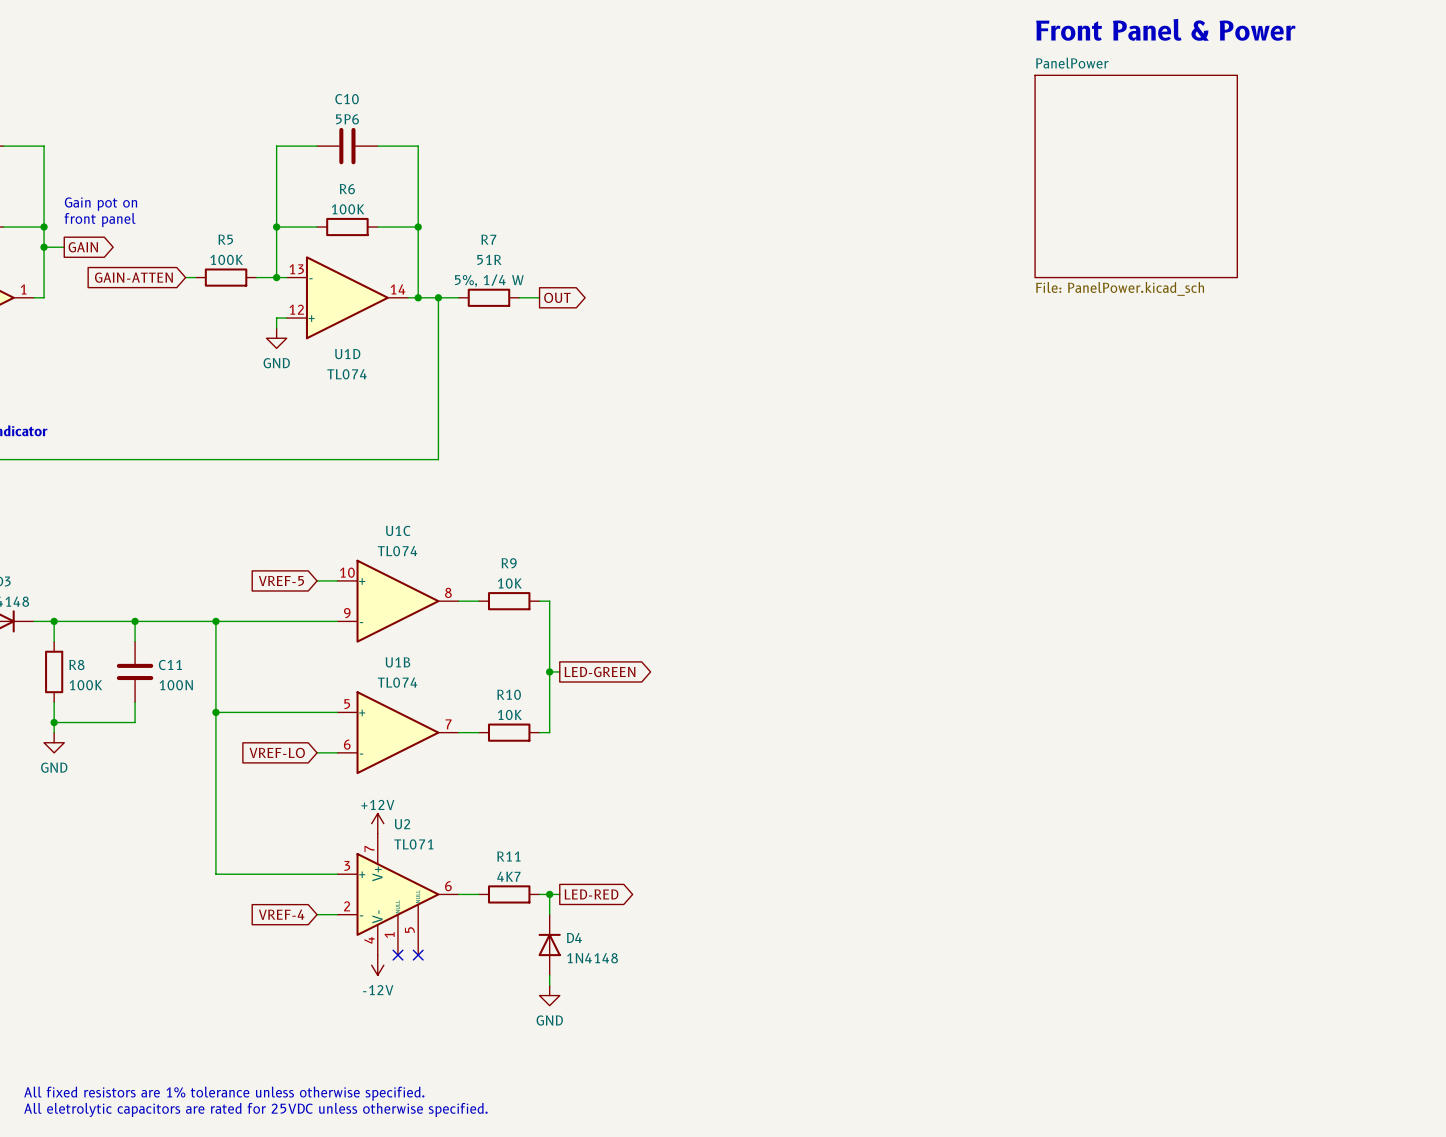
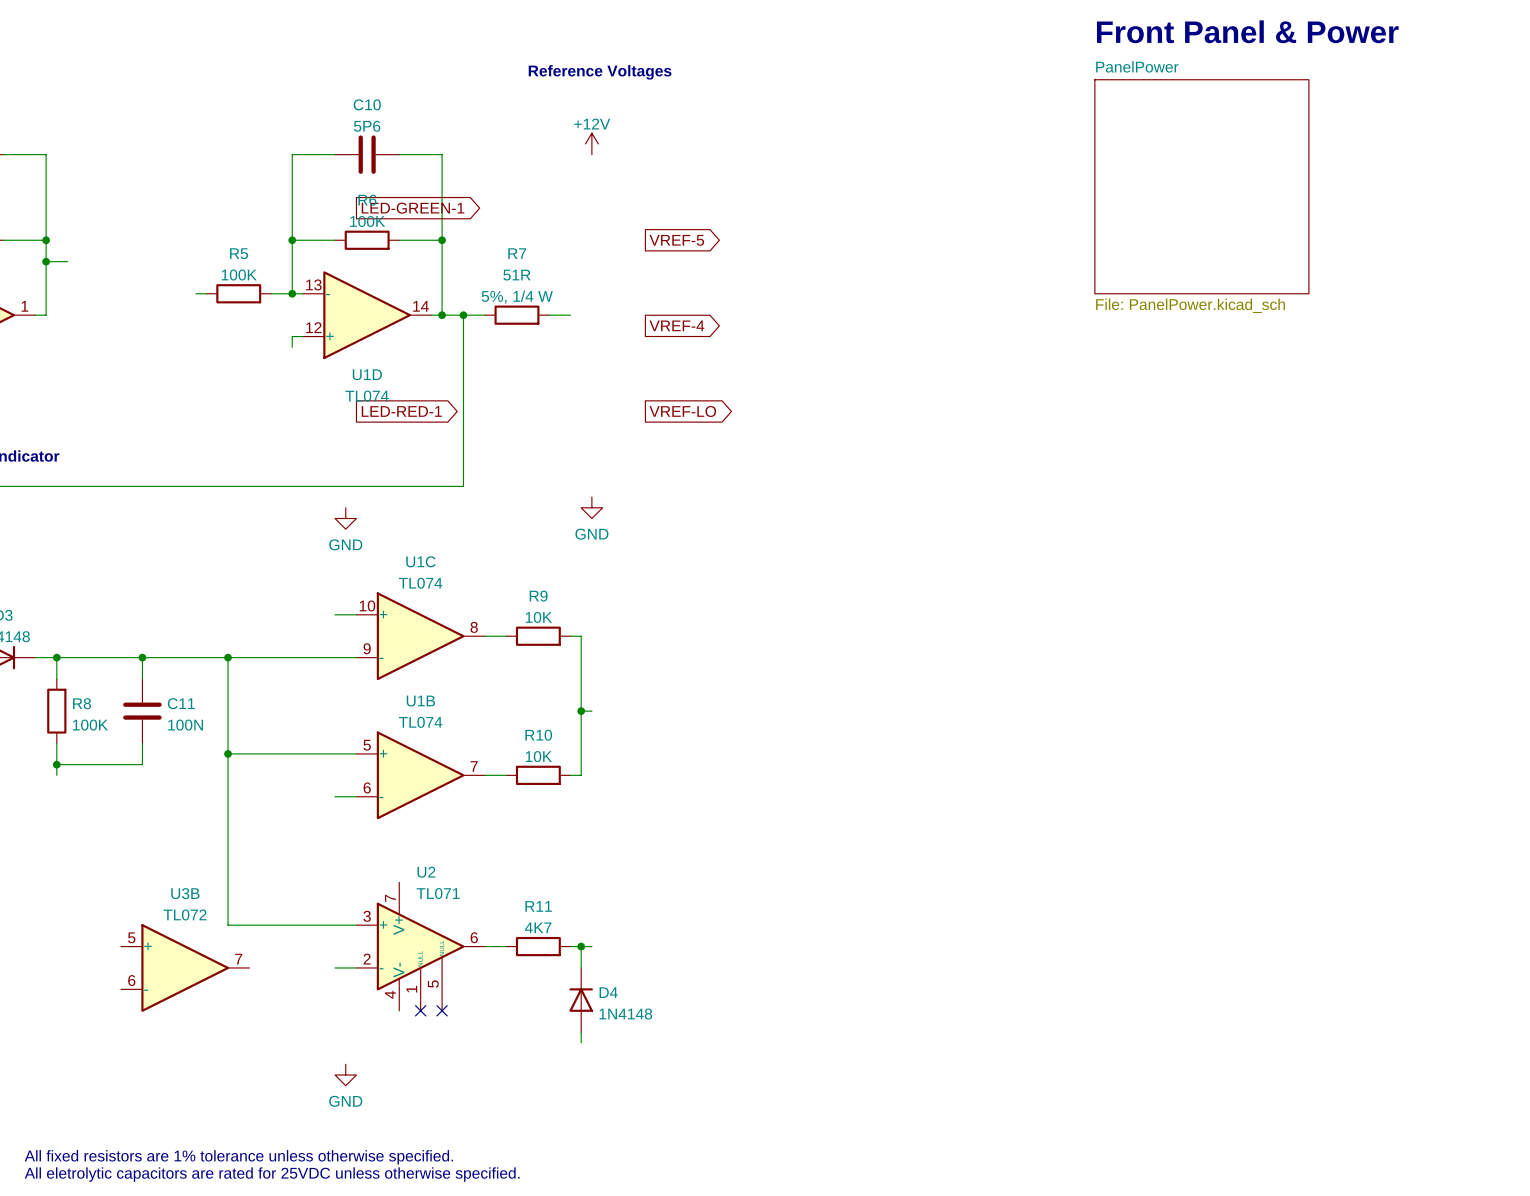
text: none -> Reference Voltages (600, 72)
power symbol: none -> +12V (591, 143)
global label: none -> LED-GREEN-1 (413, 208)
text: Gain pot on (100, 204) -> none
text: front panel (100, 220) -> none
global label: none -> VREF-5 (676, 240)
global label: GAIN (83, 247) -> none
global label: GAIN-ATTEN (133, 277) -> none
global label: OUT (557, 297) -> none
global label: none -> VREF-4 (676, 325)
power symbol: GND (276, 338) -> none
global label: none -> LED-RED-1 (401, 411)
global label: none -> VREF-LO (682, 411)
power symbol: none -> GND (591, 507)
power symbol: none -> GND (345, 518)
global label: VREF-5 (281, 581) -> none
global label: LED-GREEN (600, 672) -> none
power symbol: GND (54, 742) -> none
global label: VREF-LO (277, 752) -> none
power symbol: +12V (377, 823) -> none
global label: LED-RED (591, 894) -> none
U3B: none -> TL072 (185, 967)
global label: VREF-4 (281, 914) -> none
power symbol: -12V (377, 965) -> none
power symbol: GND (549, 995) -> none
power symbol: none -> GND (345, 1074)

